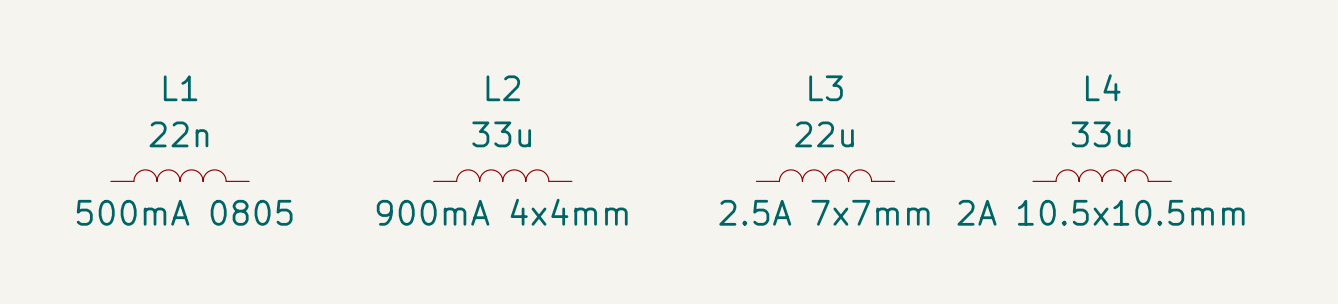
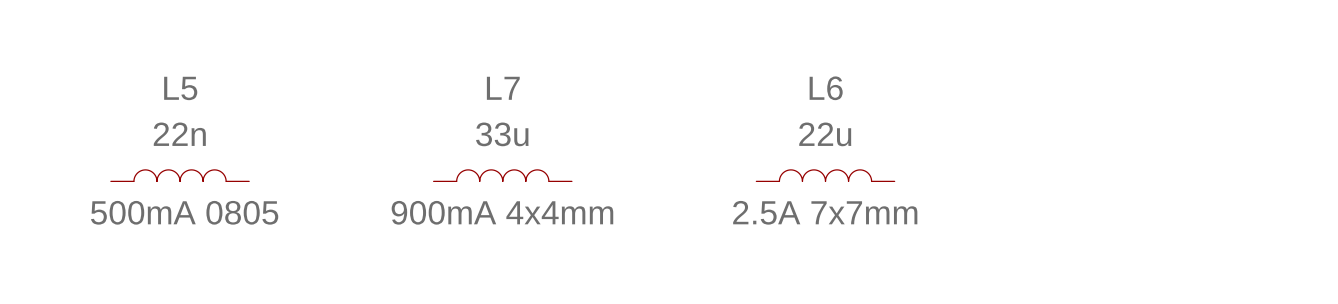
L1 name: L1 (180, 88) -> L5 (180, 88)
L2 name: L2 (503, 88) -> L7 (503, 88)
L3 name: L3 (826, 88) -> L6 (826, 88)
L4: 33u (1102, 175) -> none

